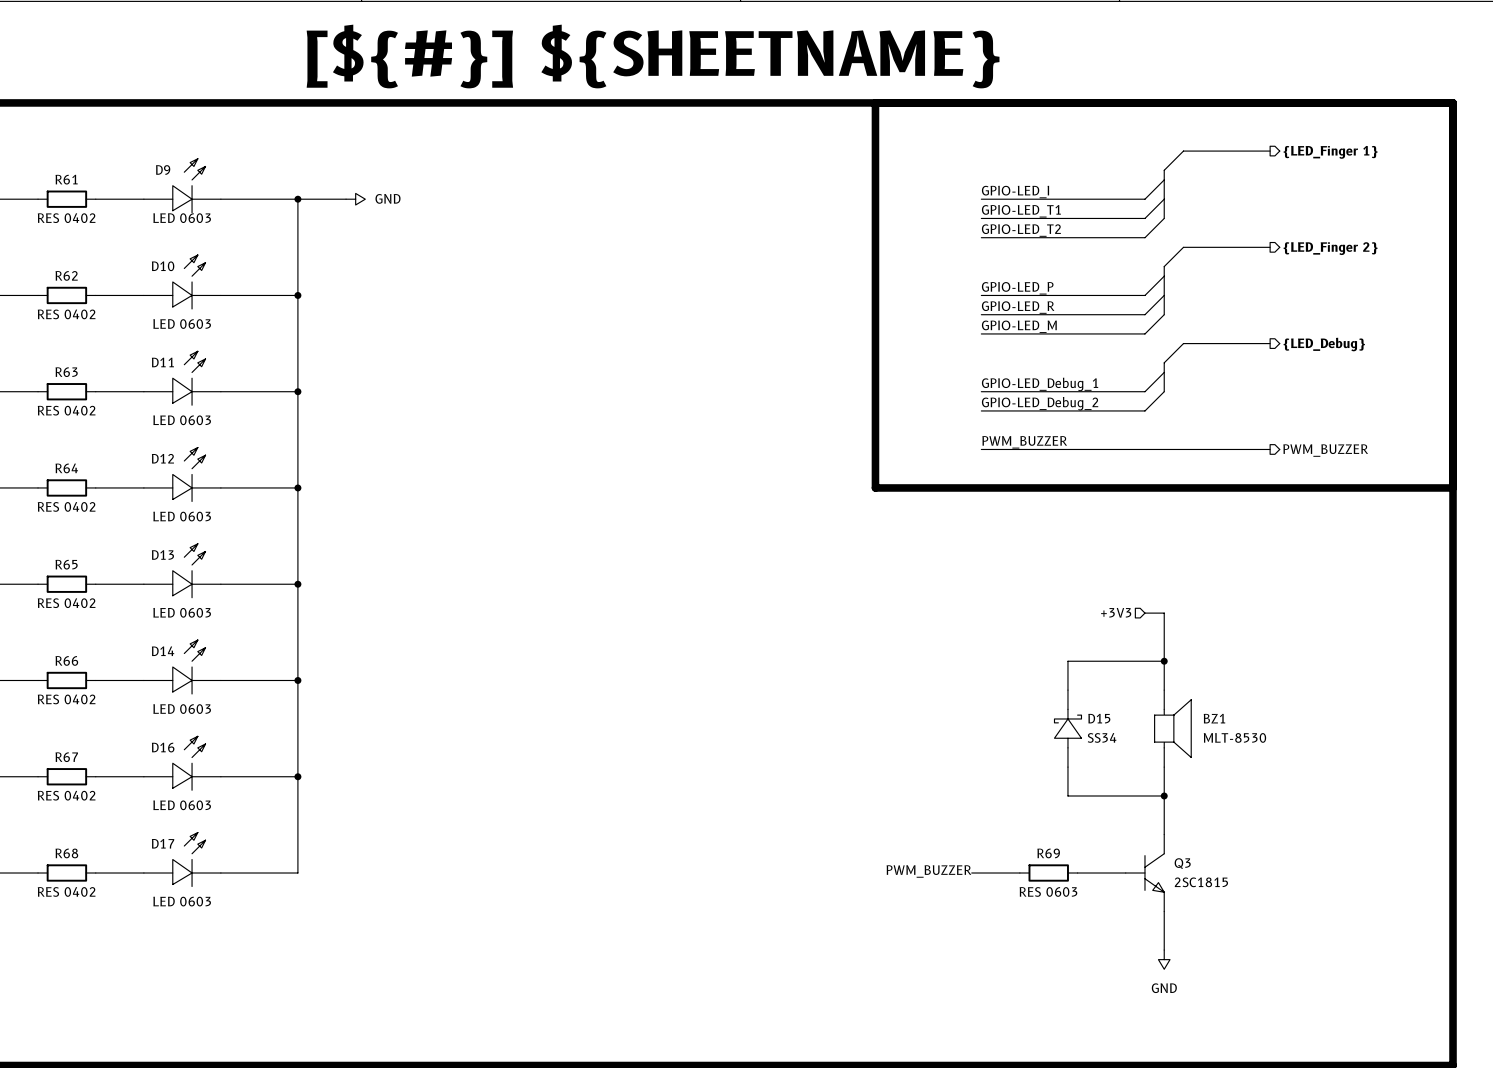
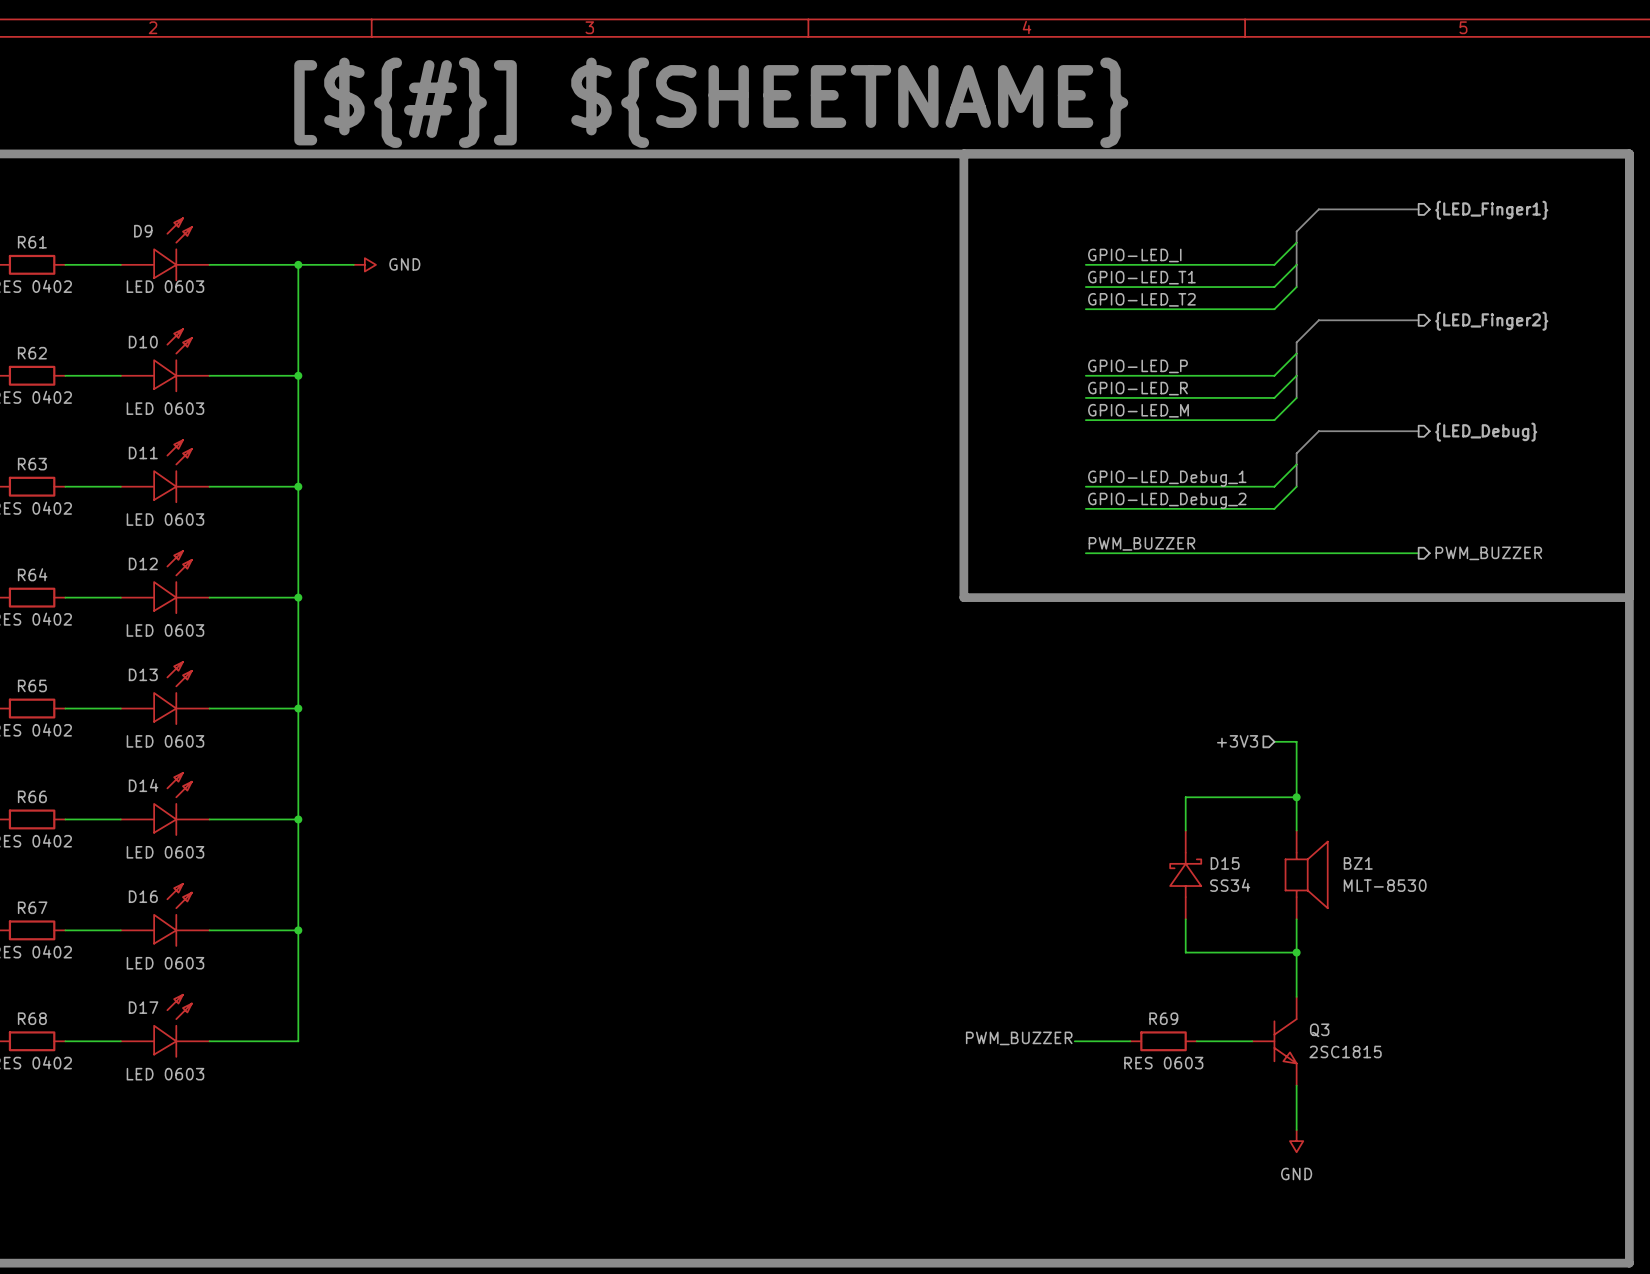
hierarchical label: {LED_Finger 1} (1330, 152) -> {LED_Finger1} (1491, 210)
hierarchical label: {LED_Finger 2} (1330, 248) -> {LED_Finger2} (1491, 321)

